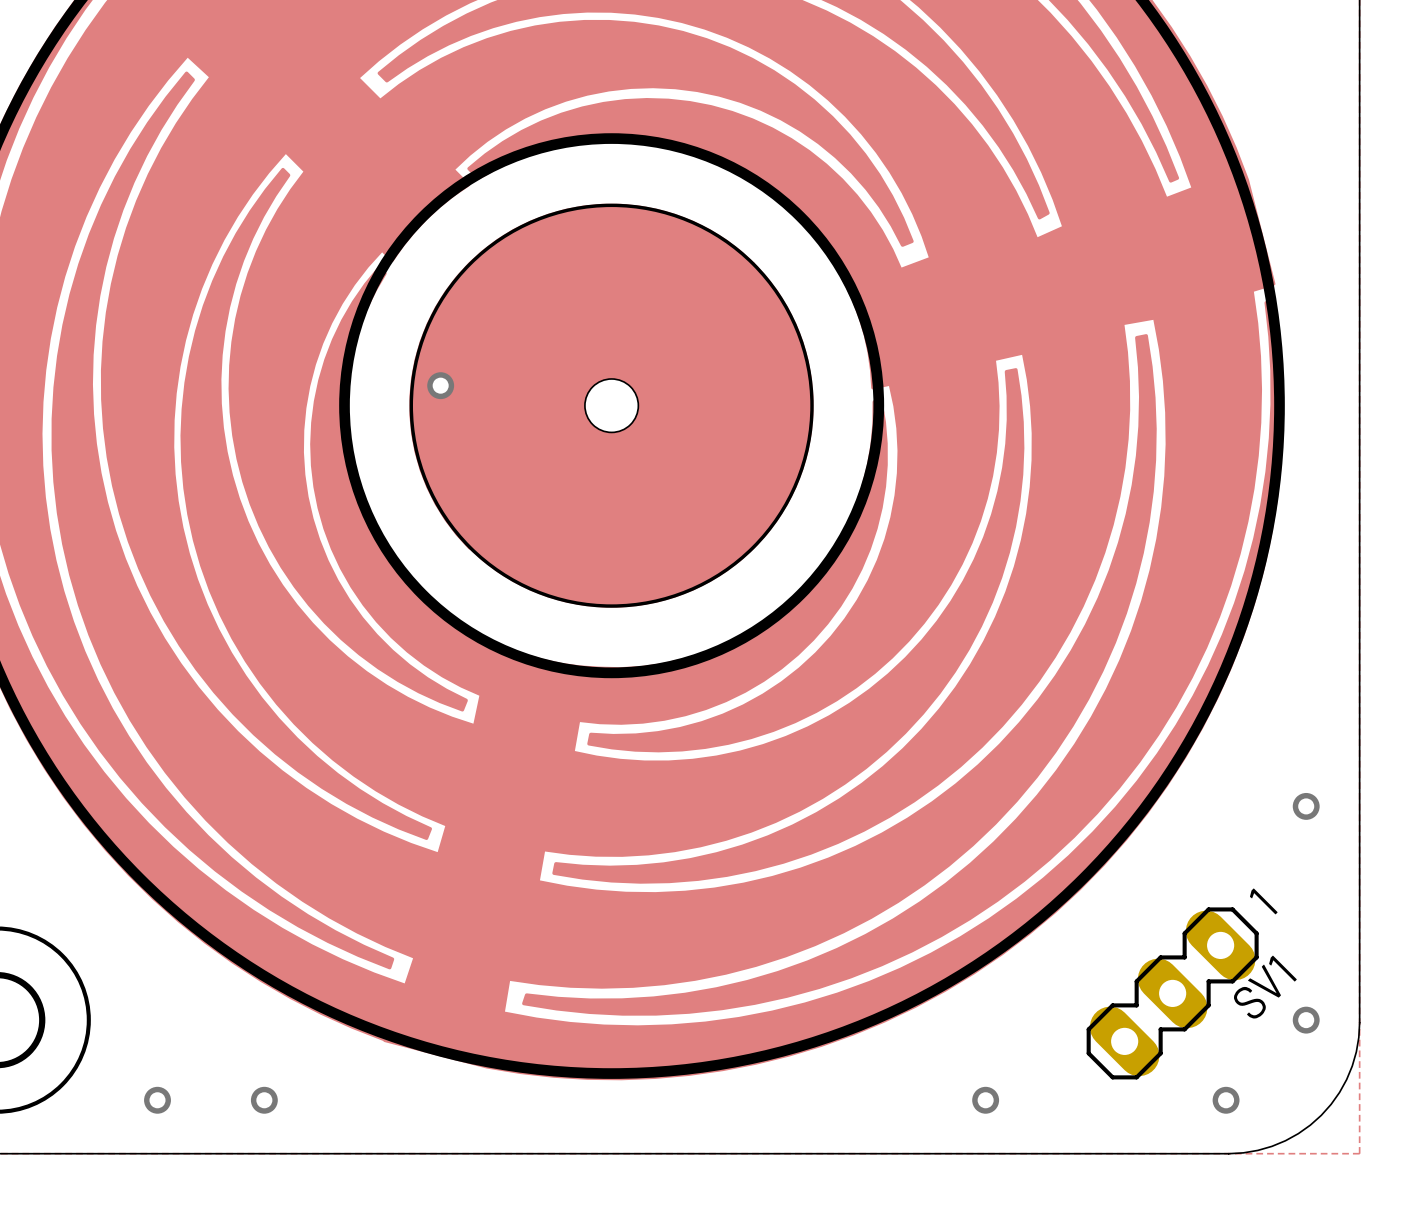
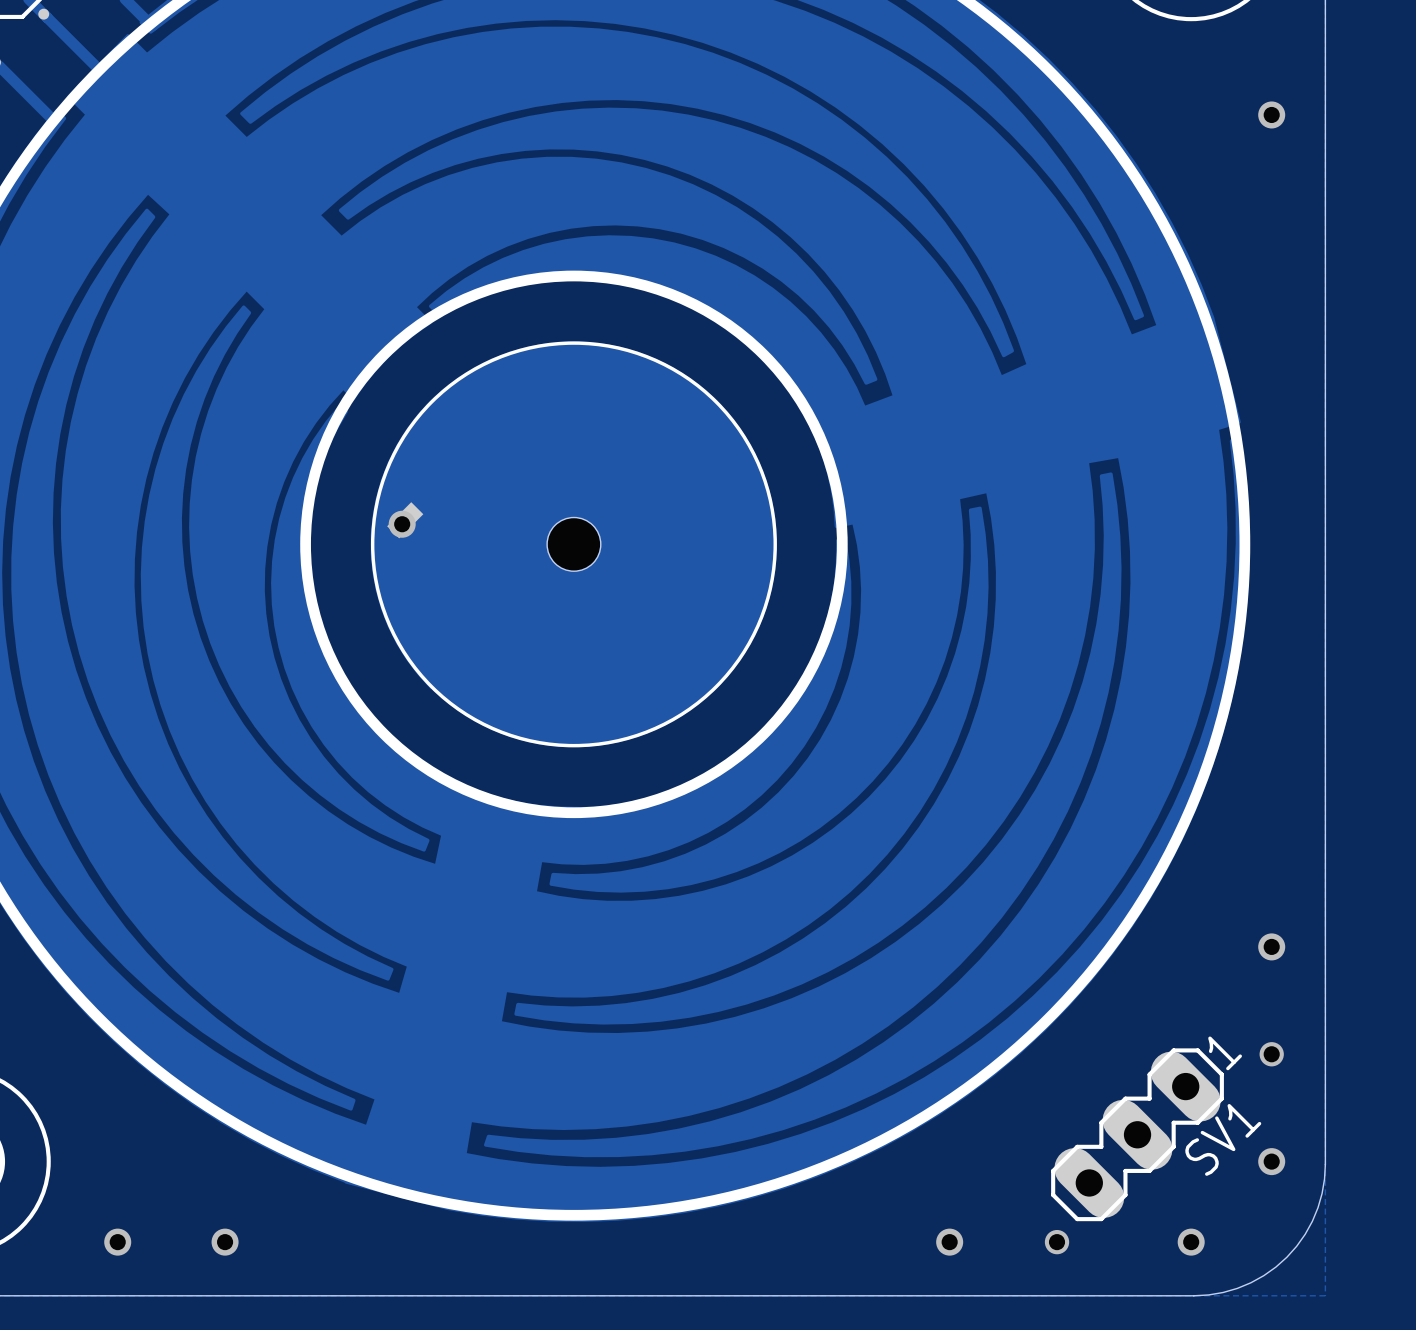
via: none -> (1271, 1054)
via: none -> (1057, 1242)

